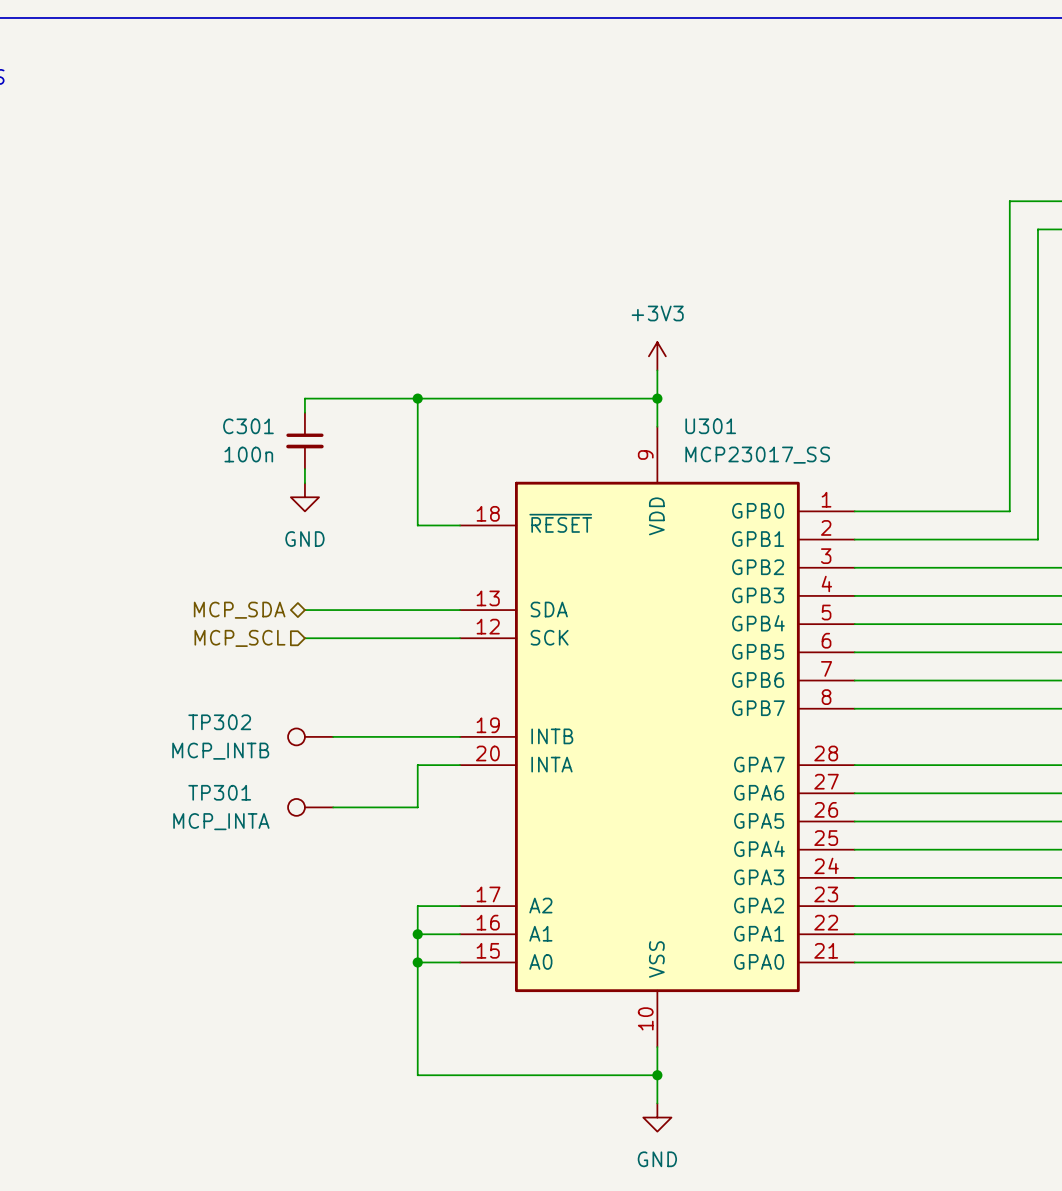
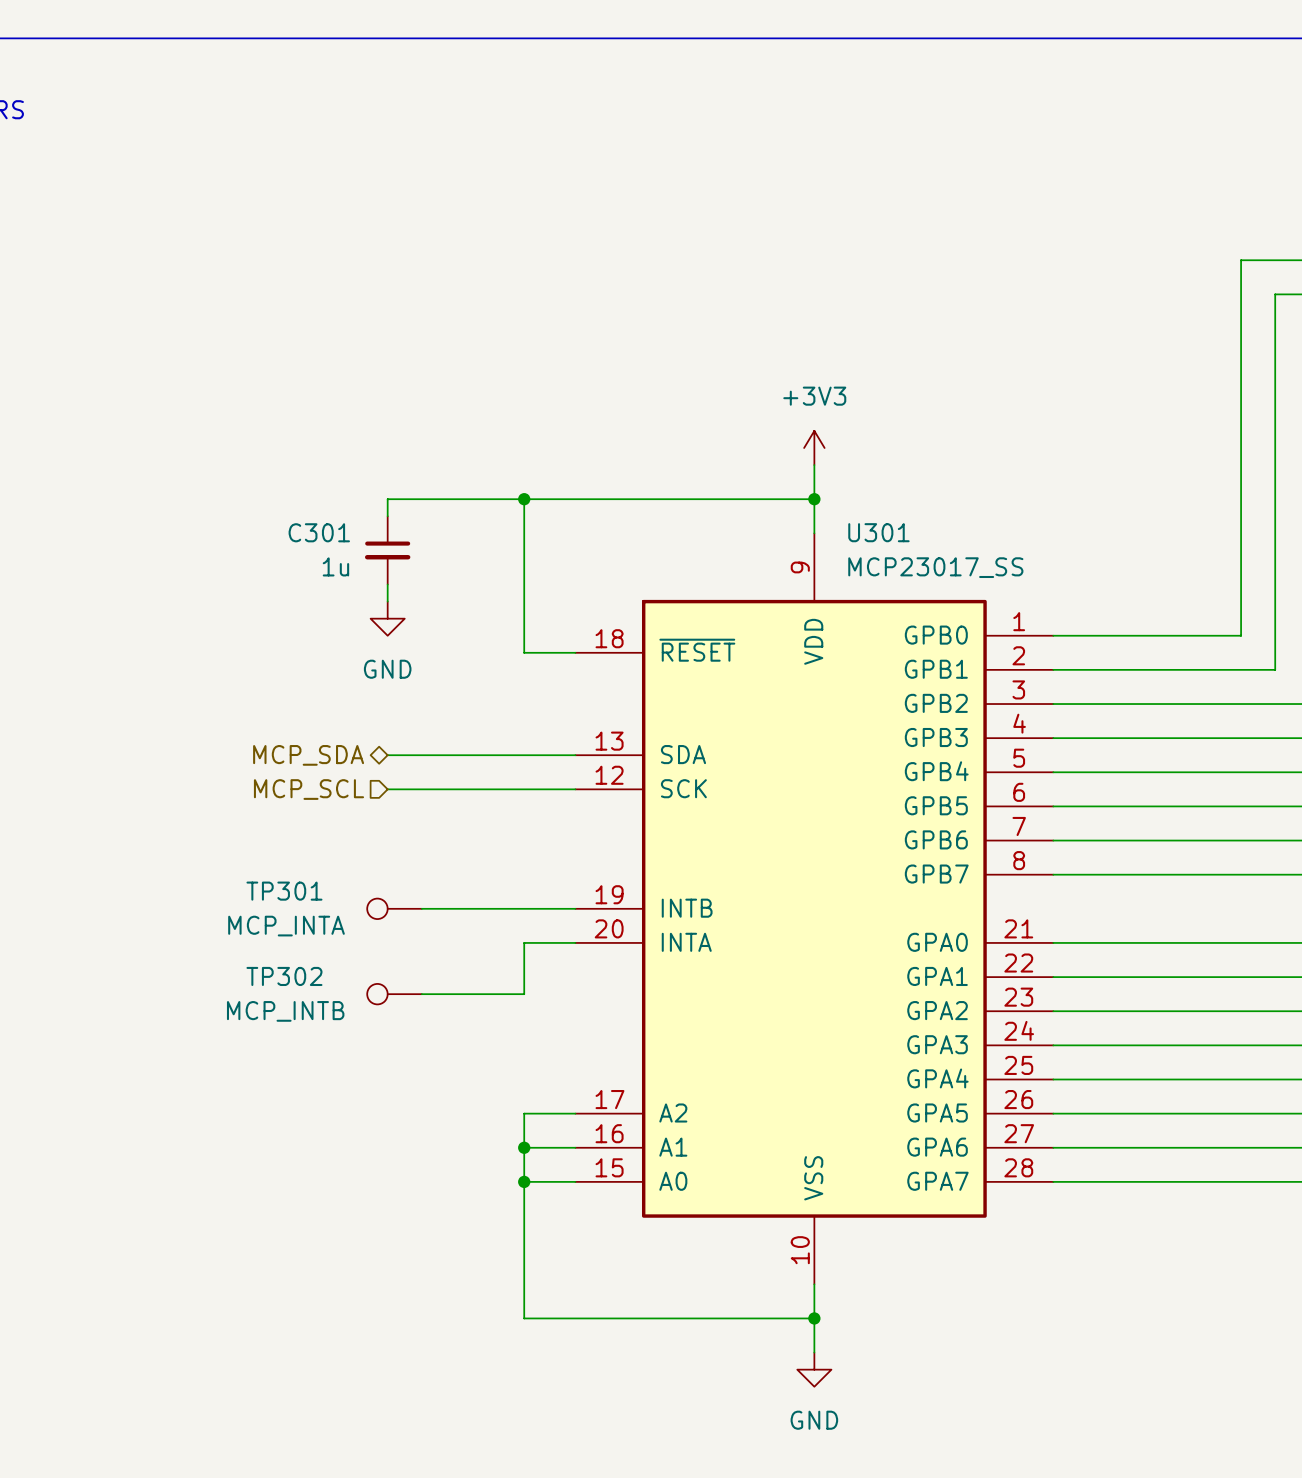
U301 symbol: [460, 426, 855, 1048] -> [575, 533, 1054, 1285]
C301 value: 100n (248, 454) -> 1u (335, 566)
TP302 name: TP302 (219, 722) -> TP301 (284, 891)
TP302 value: MCP_INTB (220, 751) -> MCP_INTA (286, 926)
TP301 name: TP301 (219, 792) -> TP302 (284, 976)
TP301 value: MCP_INTA (221, 821) -> MCP_INTB (285, 1011)

